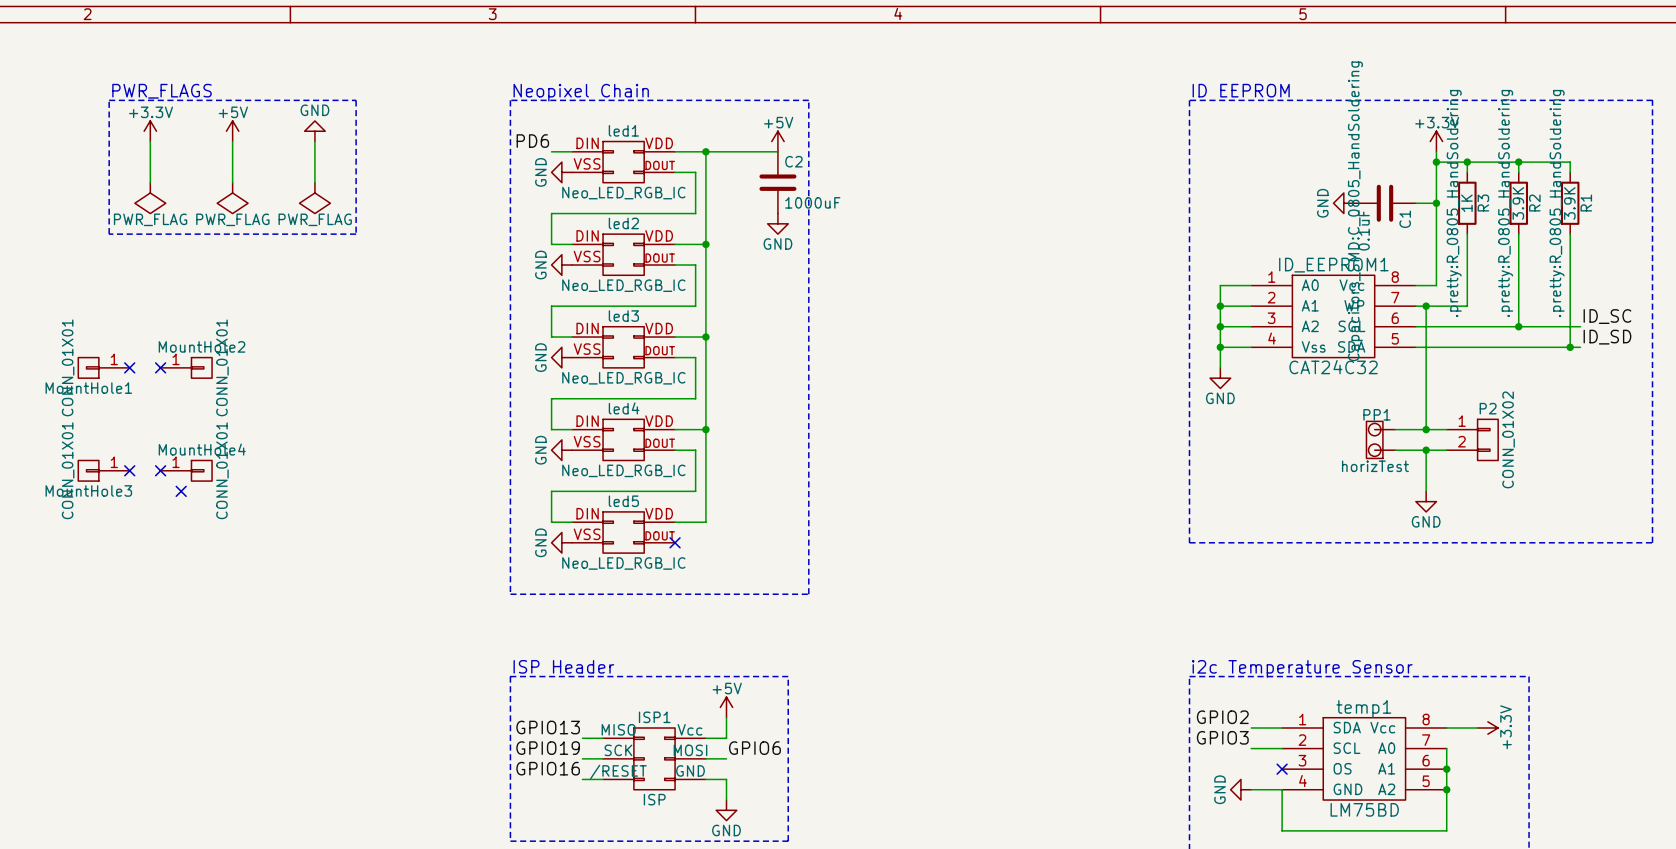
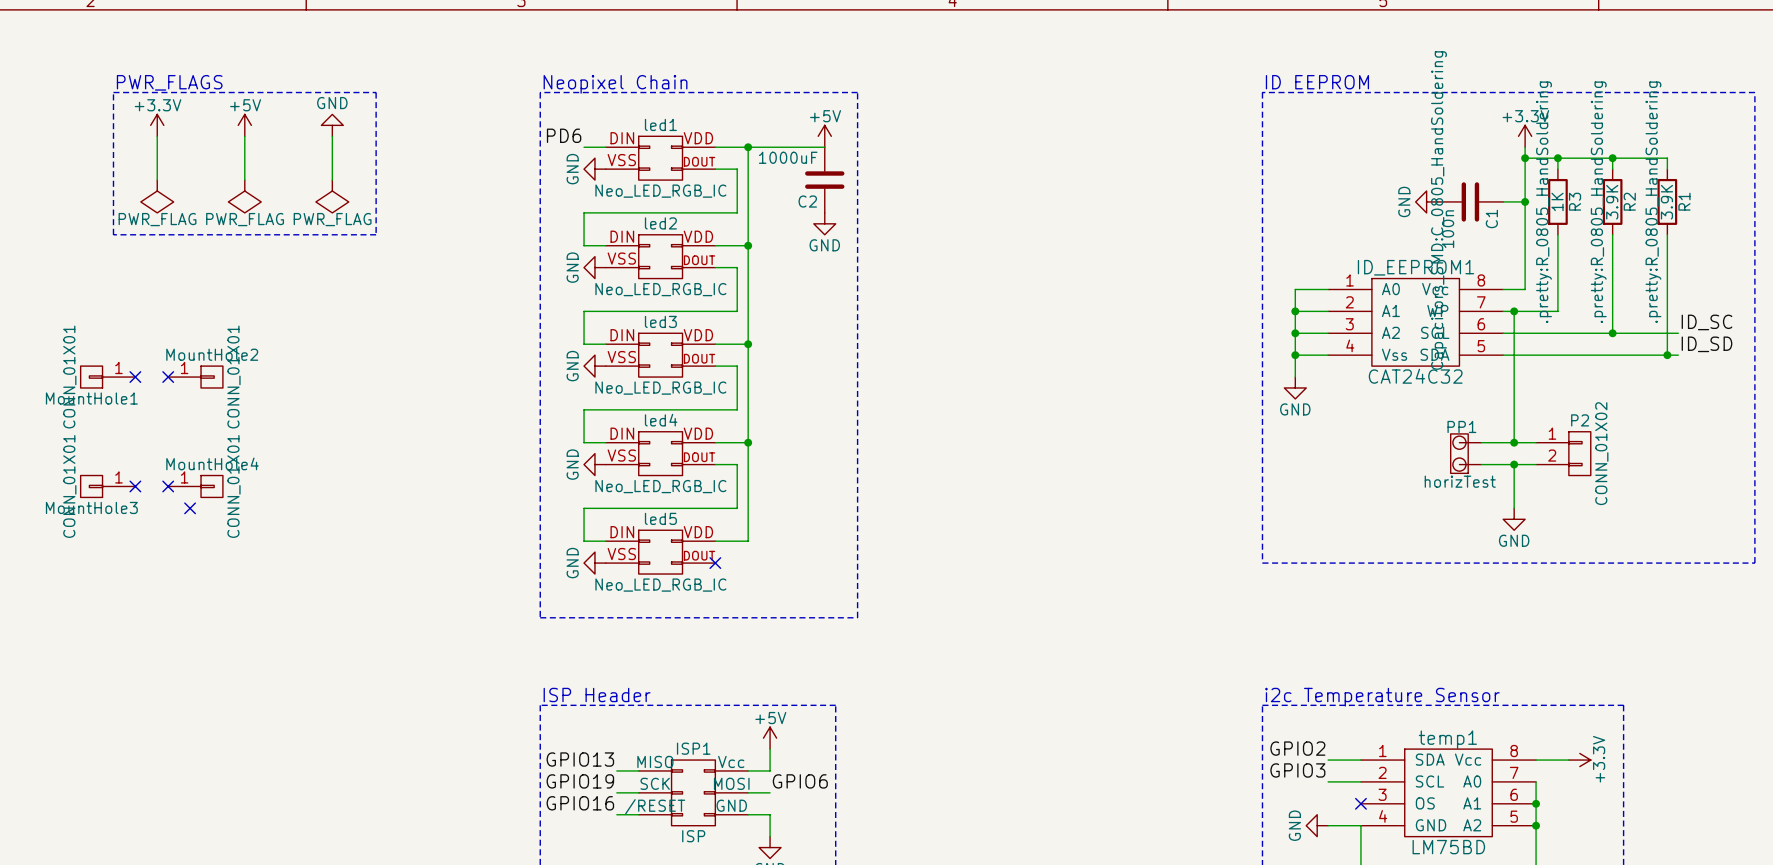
C2 name position: C2 (793, 161) -> C2 (807, 201)
C2 value position: 1000uF (812, 202) -> 1000uF (788, 157)
C1 value: 0.1uF (1364, 230) -> 100n (1448, 229)

